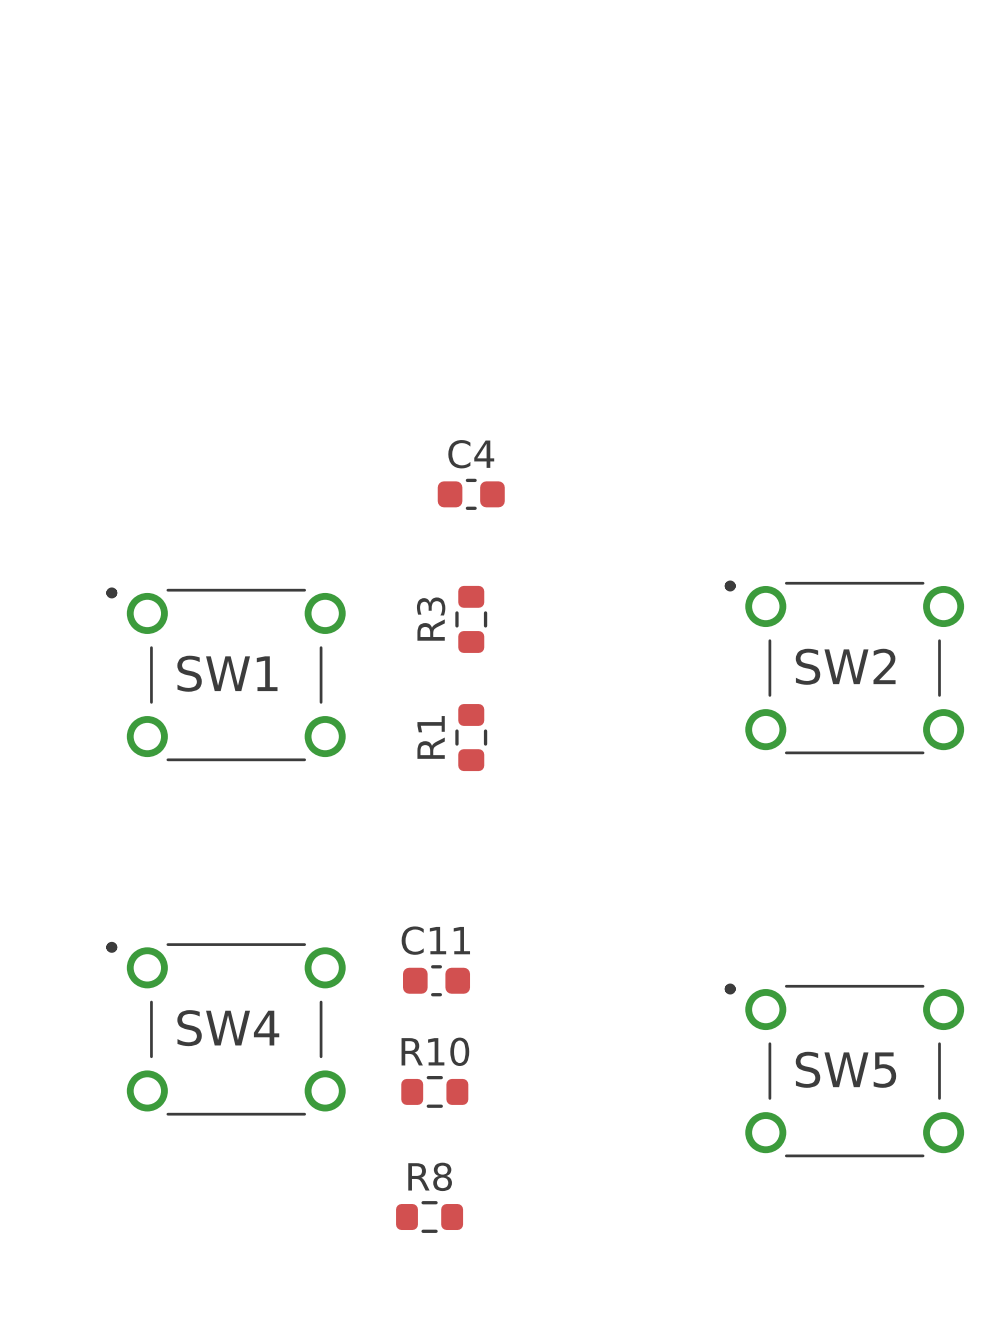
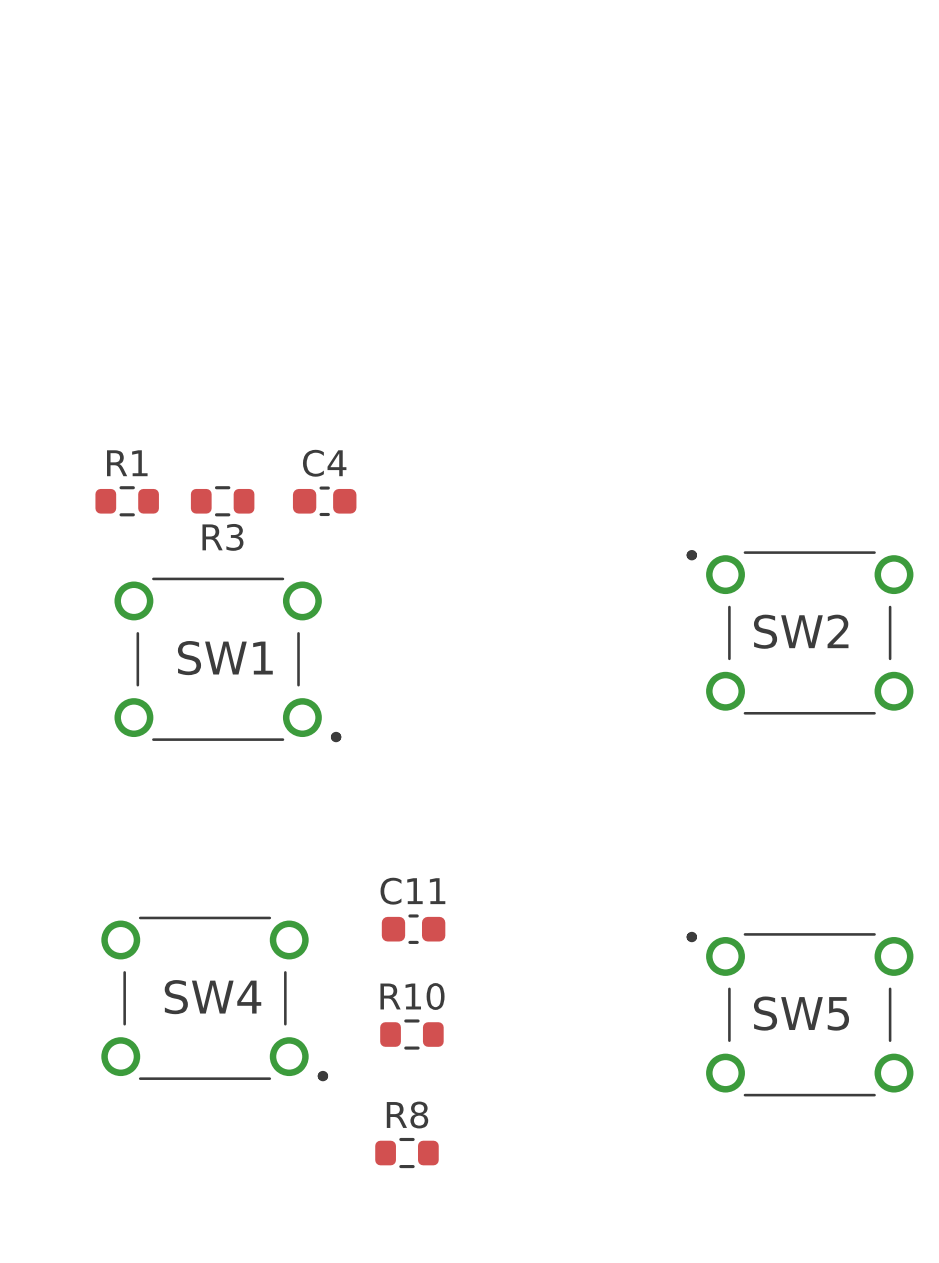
C4 position: (471, 494) -> (324, 501)
R3 name position: R3 (431, 619) -> R3 (222, 537)
R3 rotation: 0° (471, 619) -> 90° clockwise (222, 501)
R3 position: (471, 619) -> (222, 501)
SW1 rotation: 0° (226, 674) -> 180° (227, 659)
R1 rotation: 0° (471, 737) -> 90° clockwise (127, 501)
R1 position: (471, 737) -> (127, 501)
SW4 rotation: 0° (226, 1028) -> 180° (214, 998)

